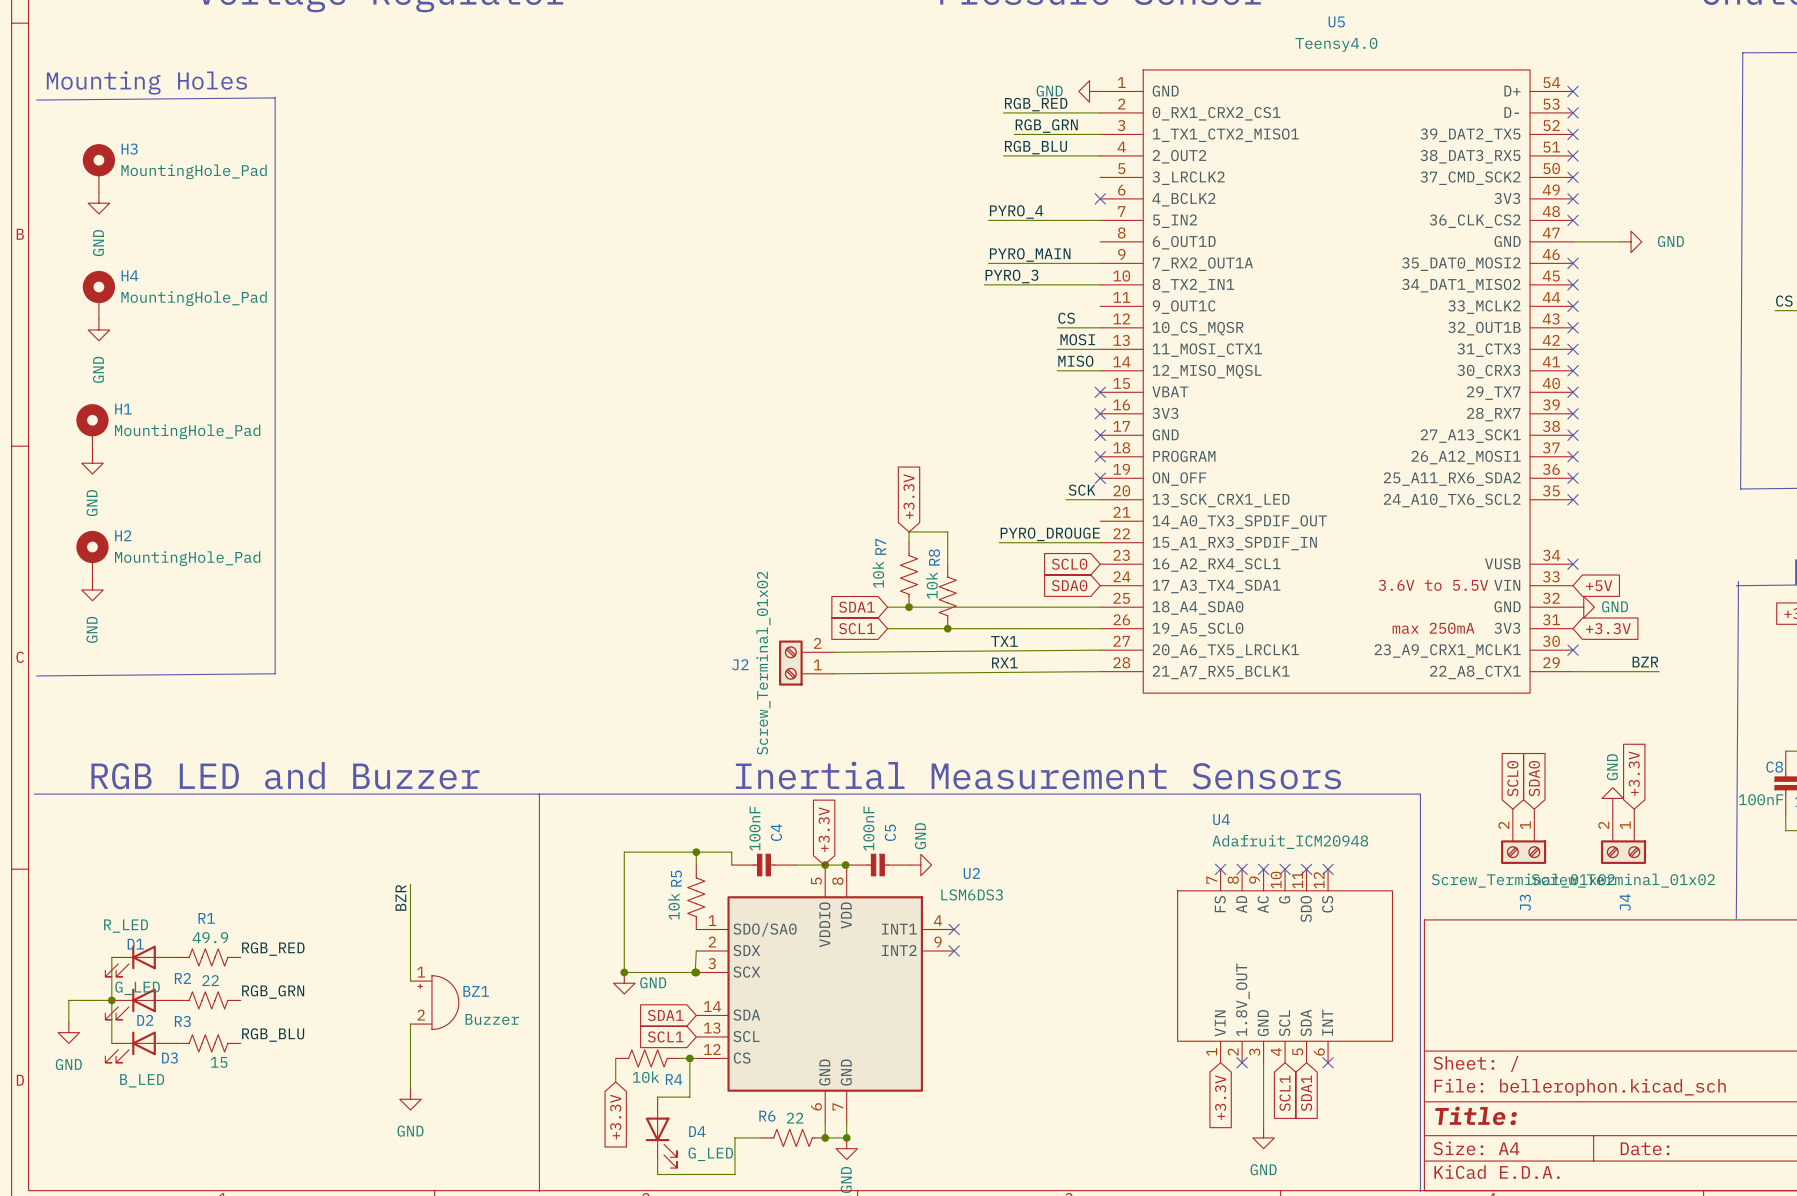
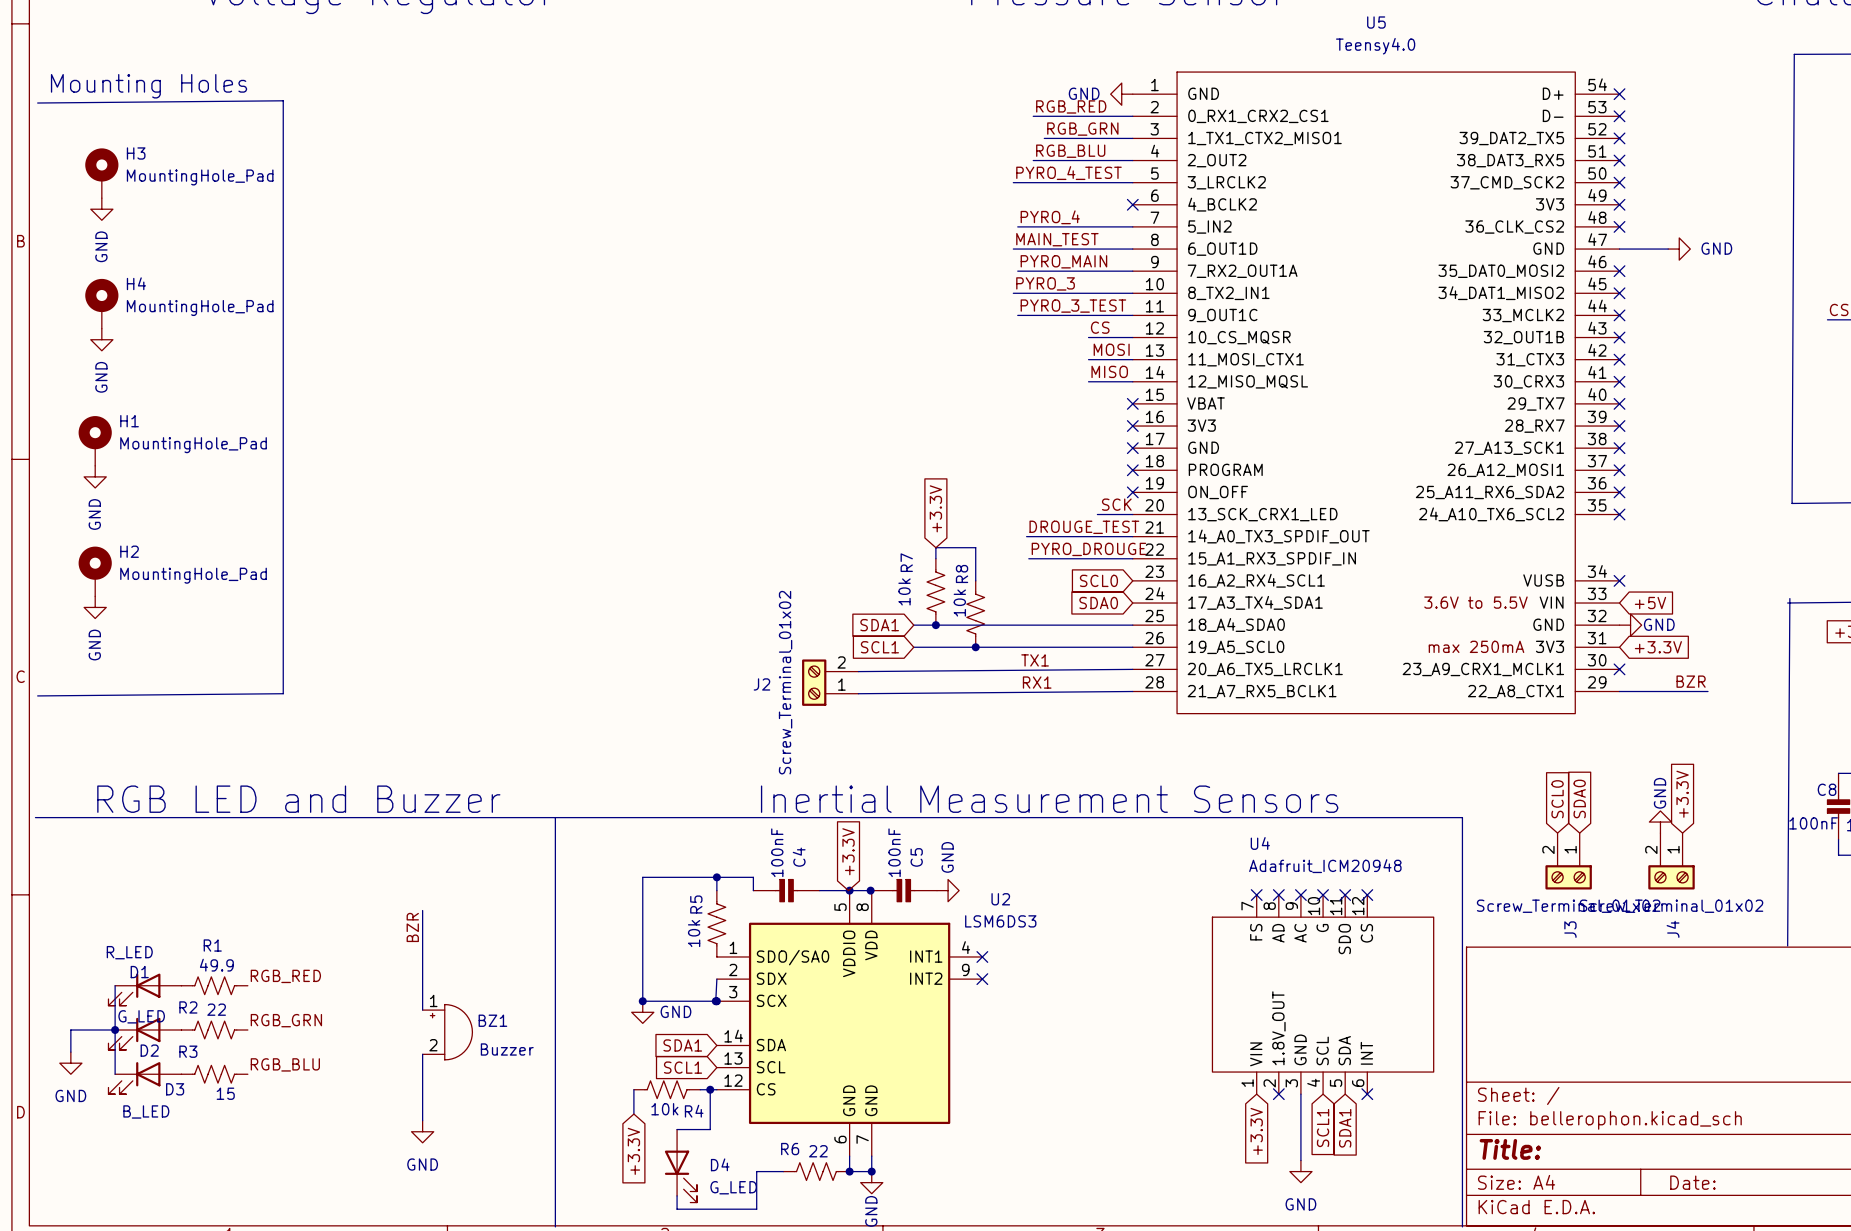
label: none -> PYRO_4_TEST (1068, 173)
wire: none -> (1013, 182) (1132, 182)
label: none -> MAIN_TEST (1057, 239)
wire: none -> (1013, 249) (1132, 249)
label: none -> PYRO_3_TEST (1073, 306)
wire: none -> (1017, 315) (1132, 315)
label: none -> DROUGE_TEST (1084, 527)
wire: none -> (1026, 536) (1132, 536)

